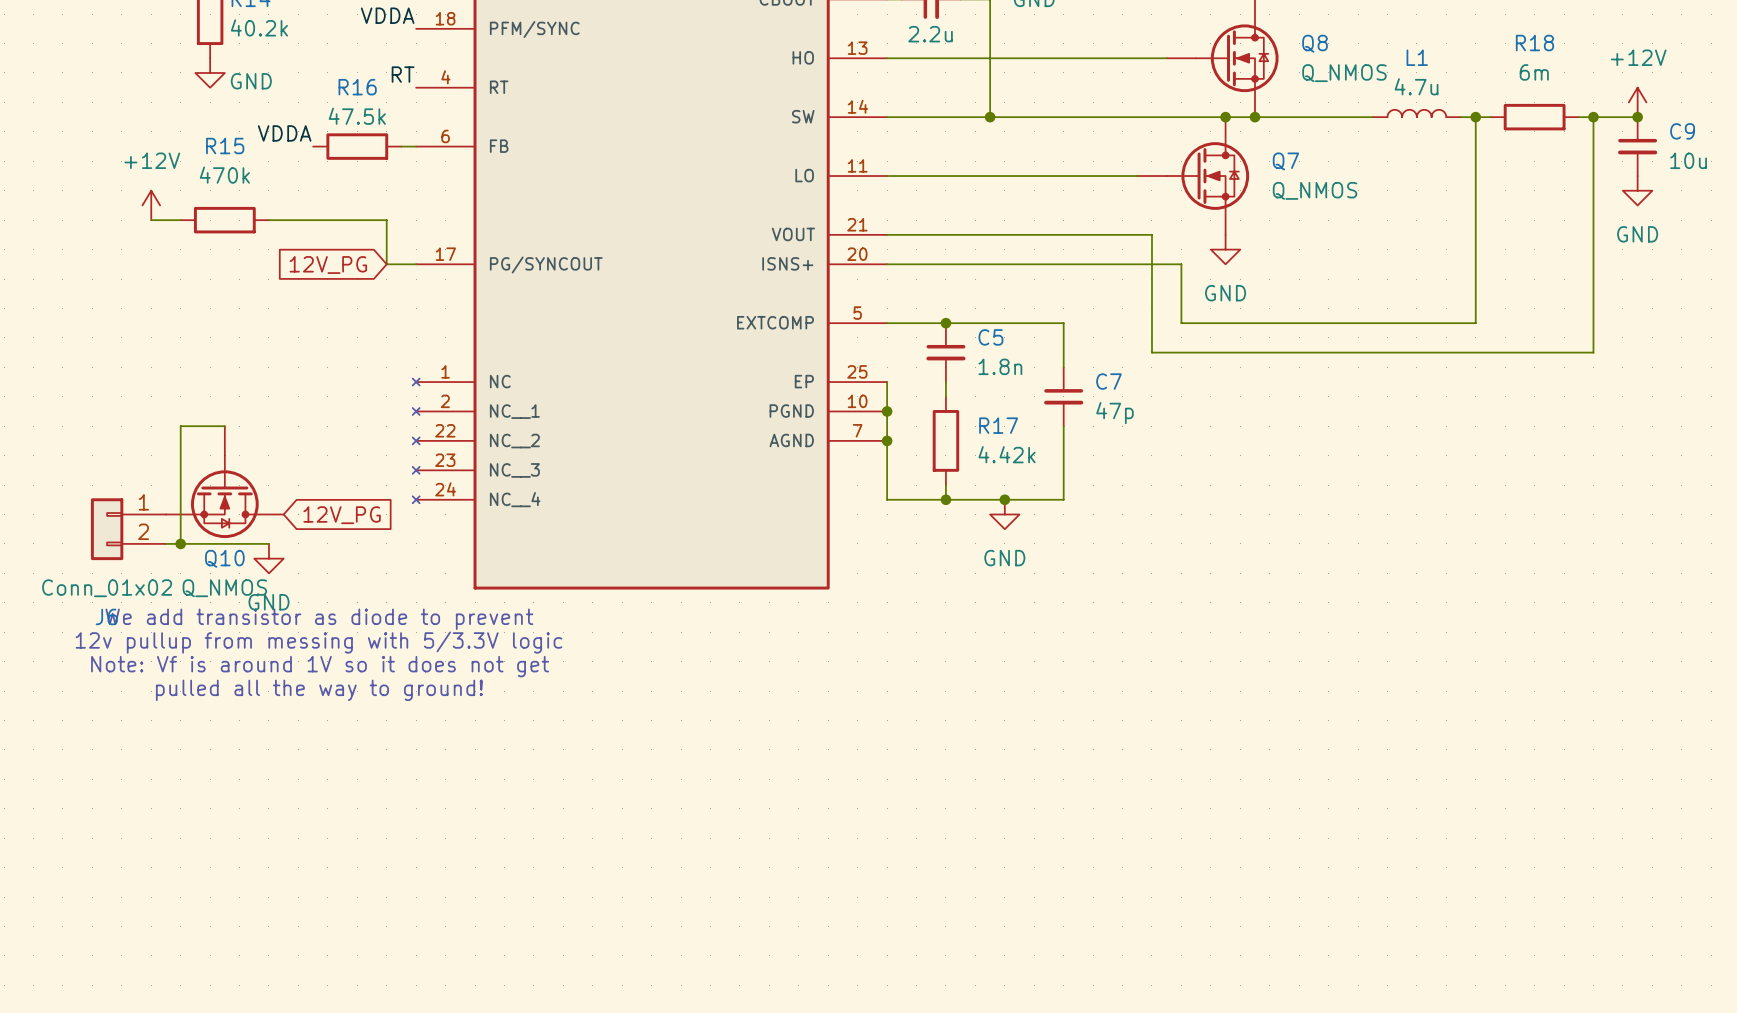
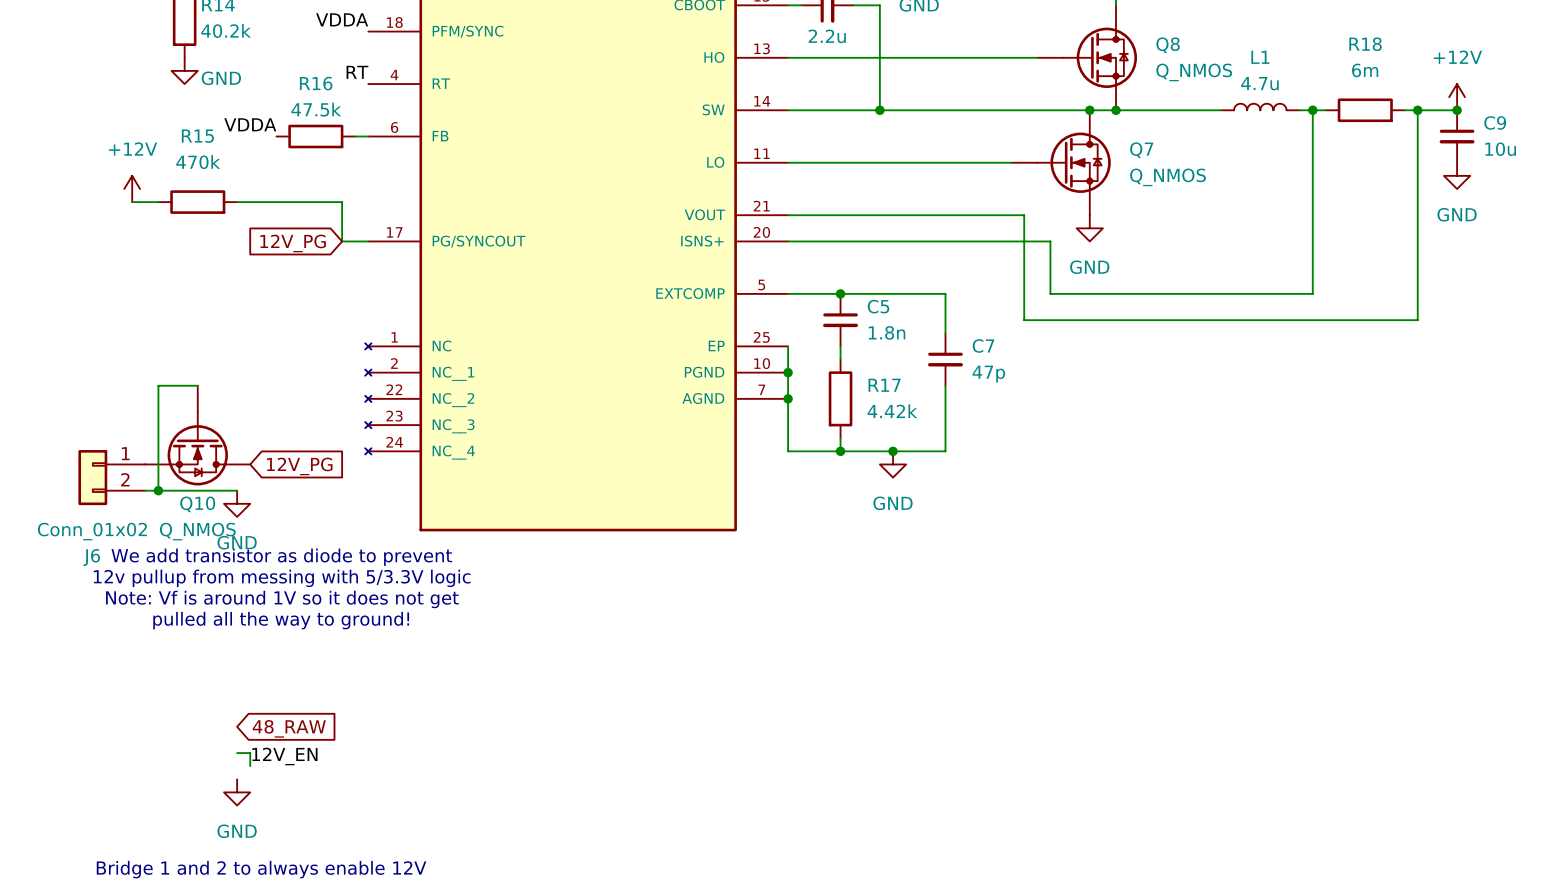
global label: none -> 48_RAW (289, 728)
wire: none -> (237, 753) (250, 753) (250, 766)
label: none -> 12V_EN (284, 756)
power symbol: none -> GND (237, 792)
text: none -> Bridge 1 and 2 to always enable 12V (261, 869)

